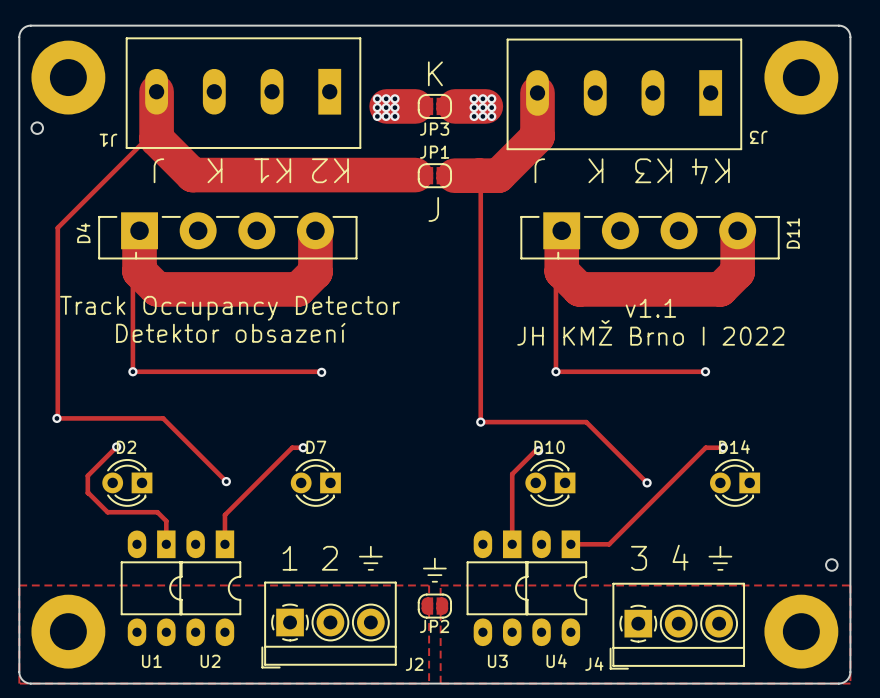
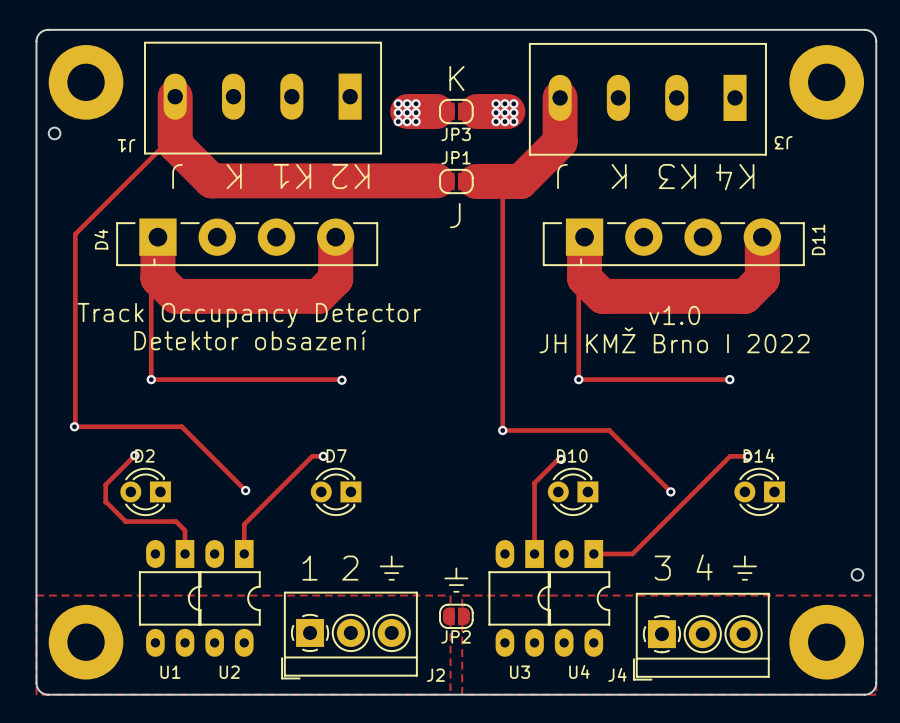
text: v1.1 (650, 308) -> v1.0 (674, 315)

